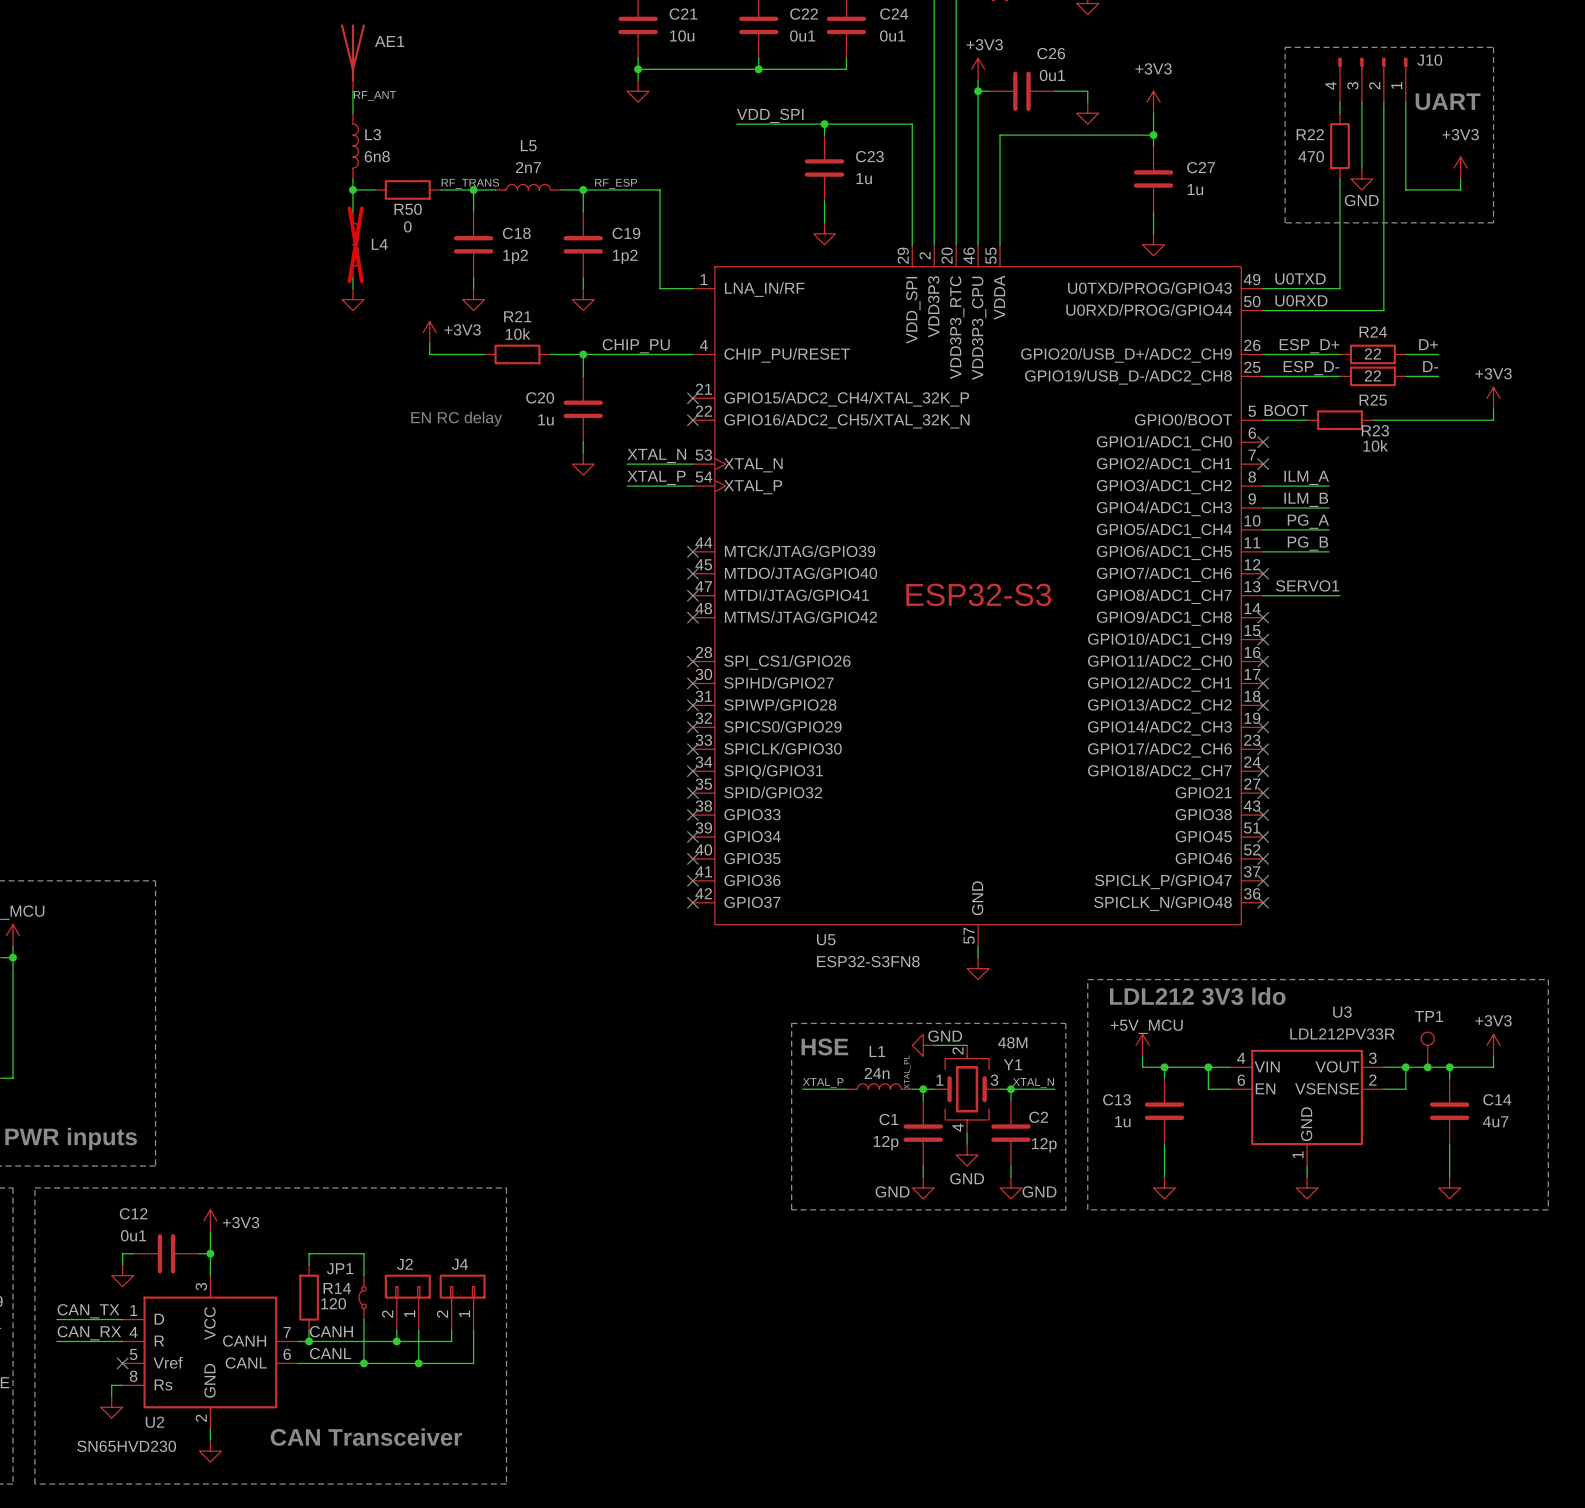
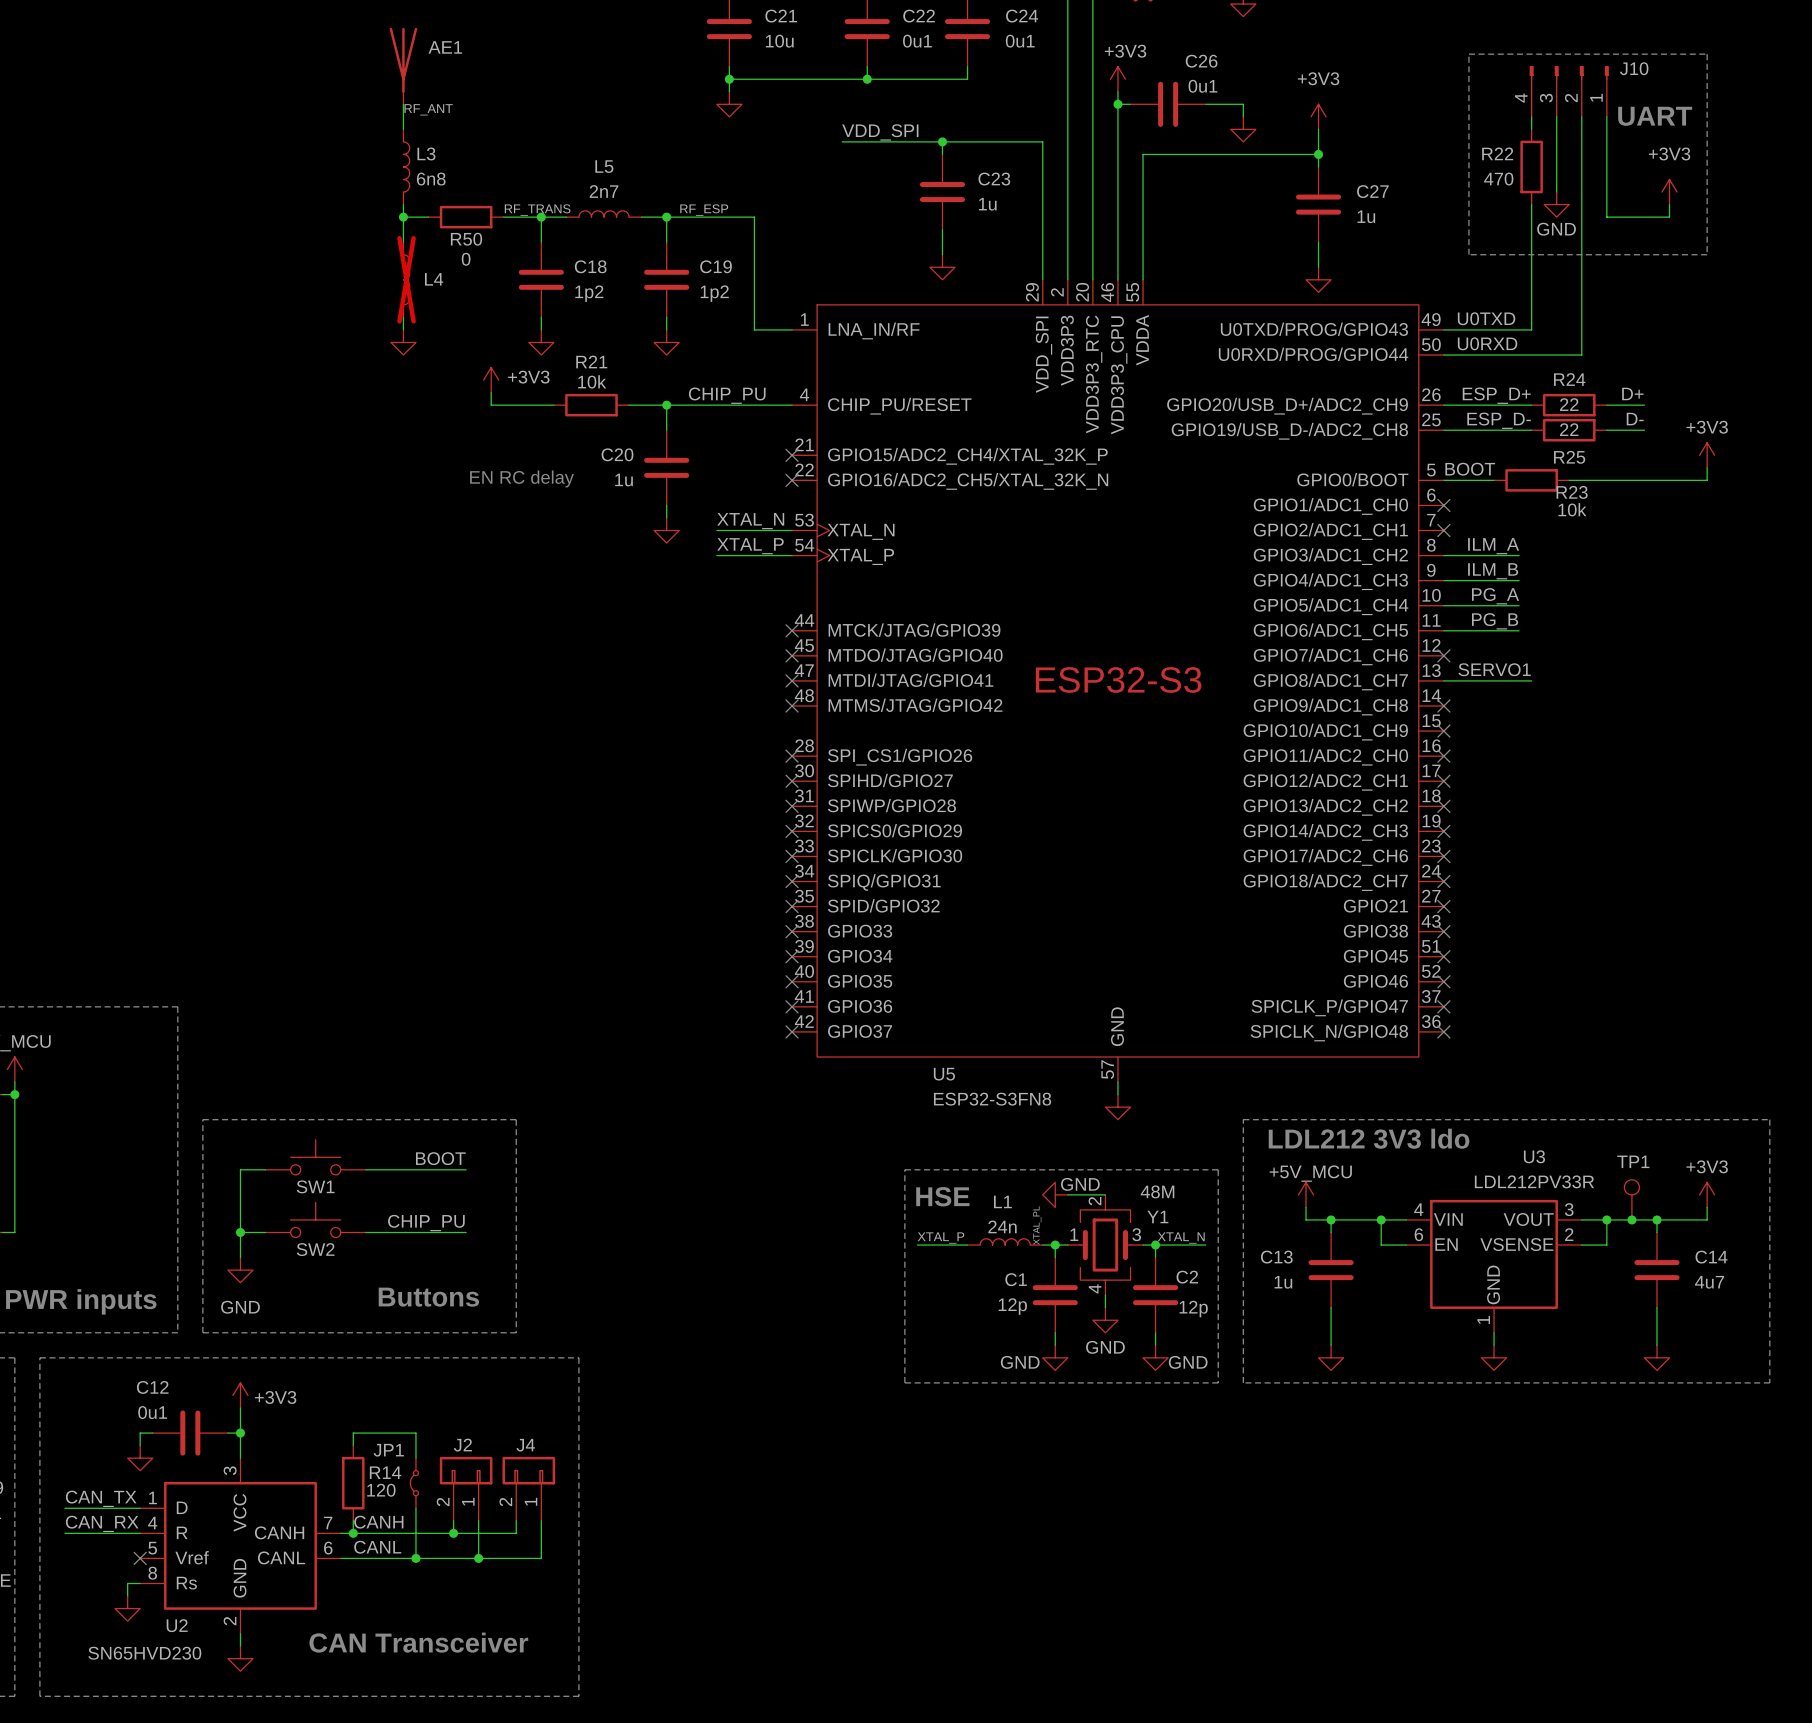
line: none -> (202, 1119) (516, 1119) (516, 1332) (202, 1332) (202, 1119)
SW1: none -> (315, 1157)
label: none -> BOOT (440, 1158)
wire: none -> (265, 1169) (240, 1169) (240, 1257)
wire: none -> (365, 1169) (466, 1169)
SW2: none -> (315, 1219)
label: none -> CHIP_PU (426, 1223)
wire: none -> (240, 1232) (265, 1232)
junction: none -> (240, 1232)
wire: none -> (365, 1232) (466, 1232)
power symbol: none -> GND (240, 1270)
text: none -> Buttons (428, 1297)

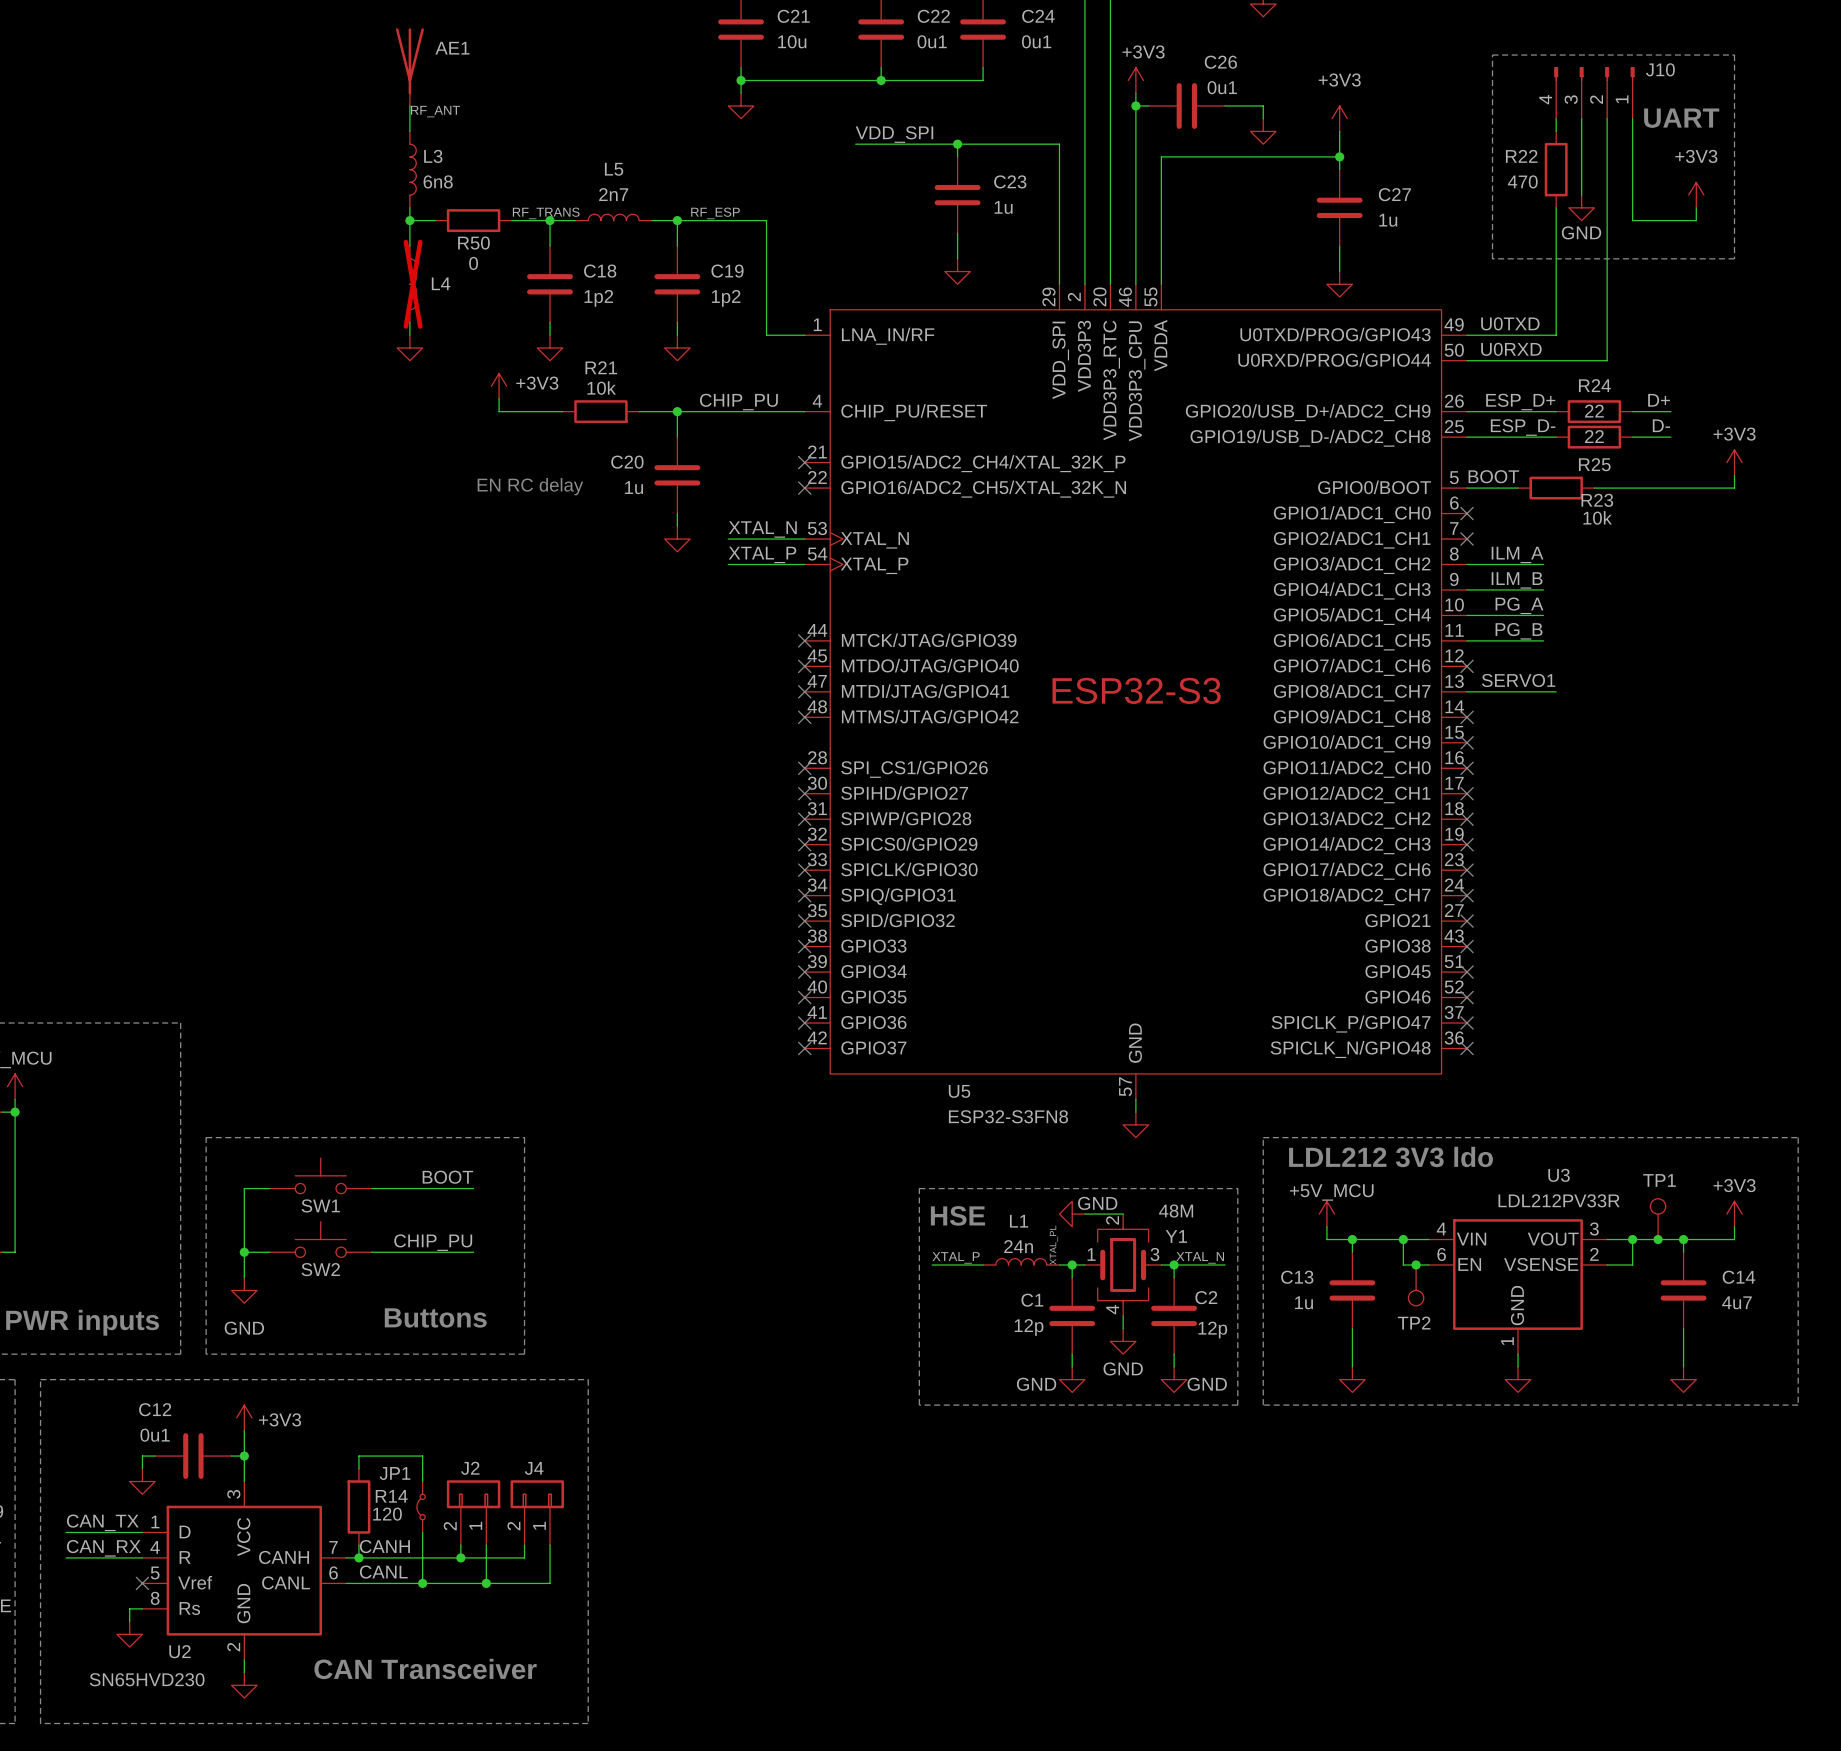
junction: none -> (1416, 1265)
TP2: none -> (1416, 1285)

